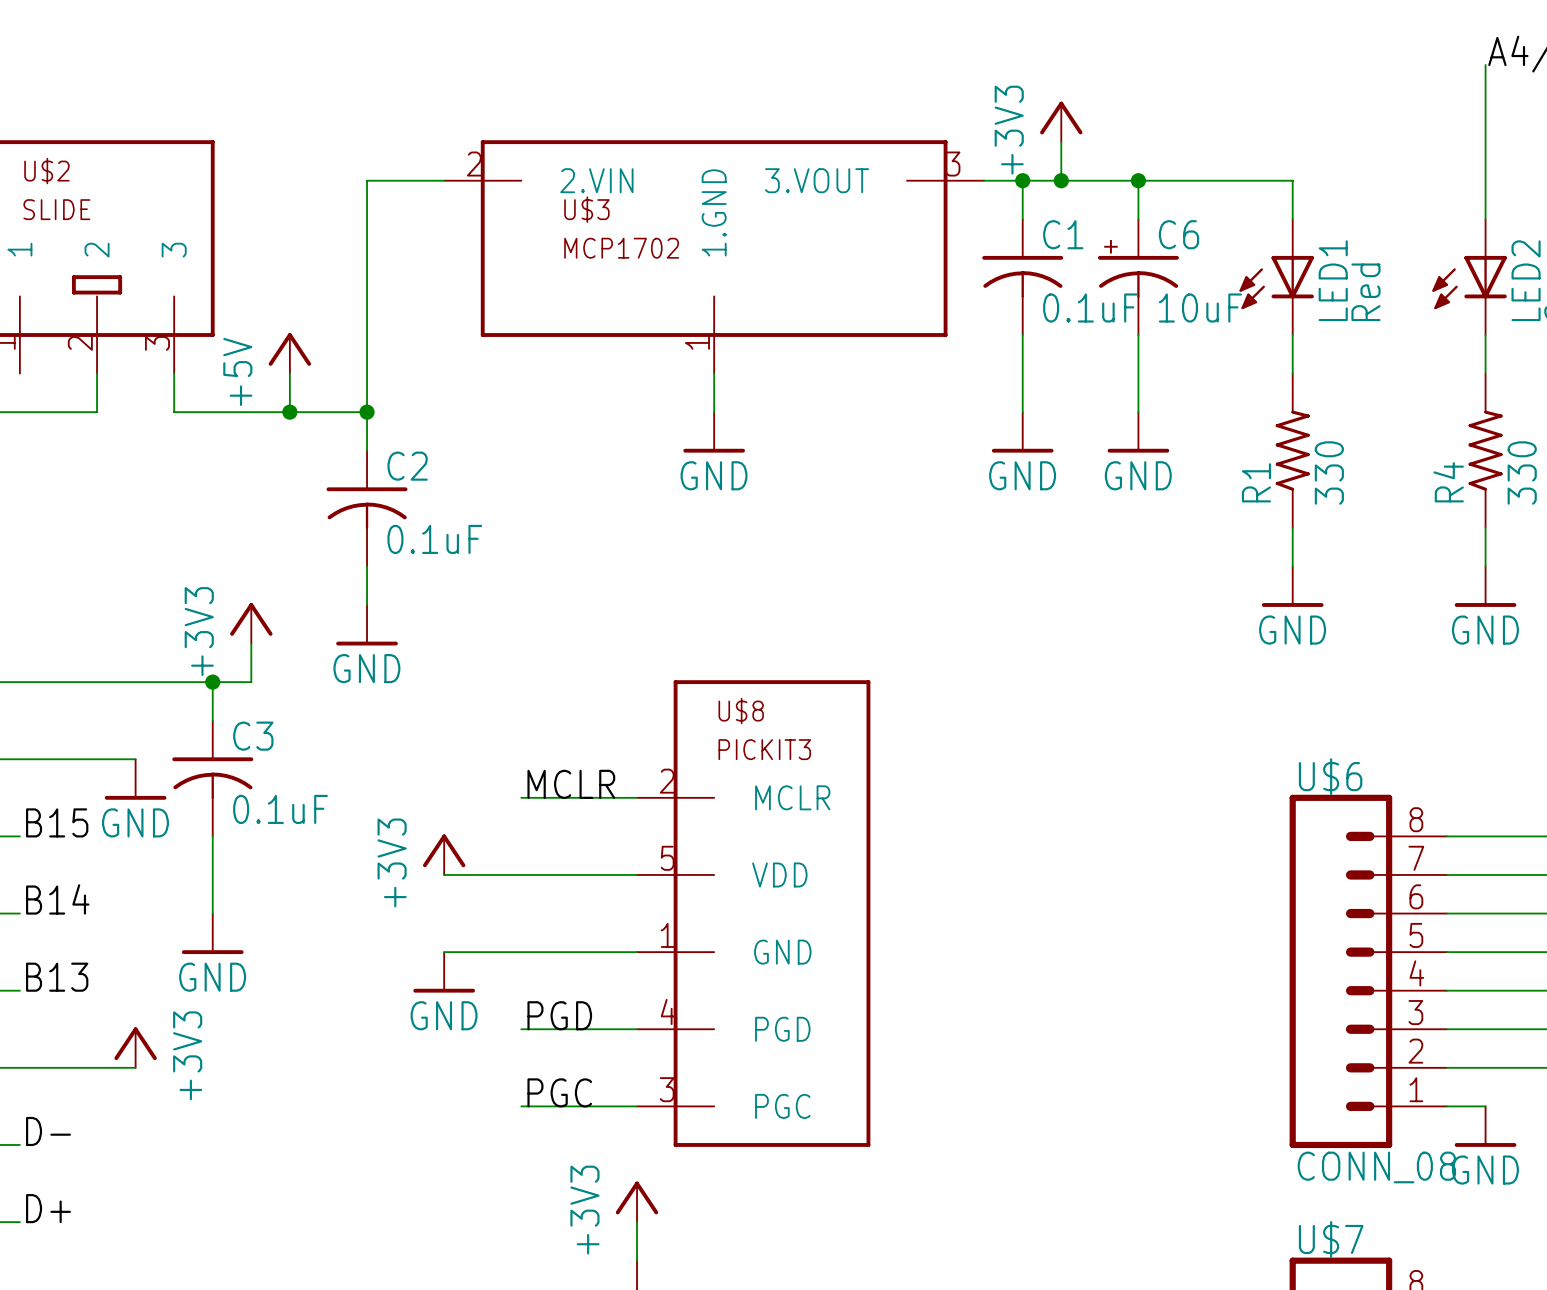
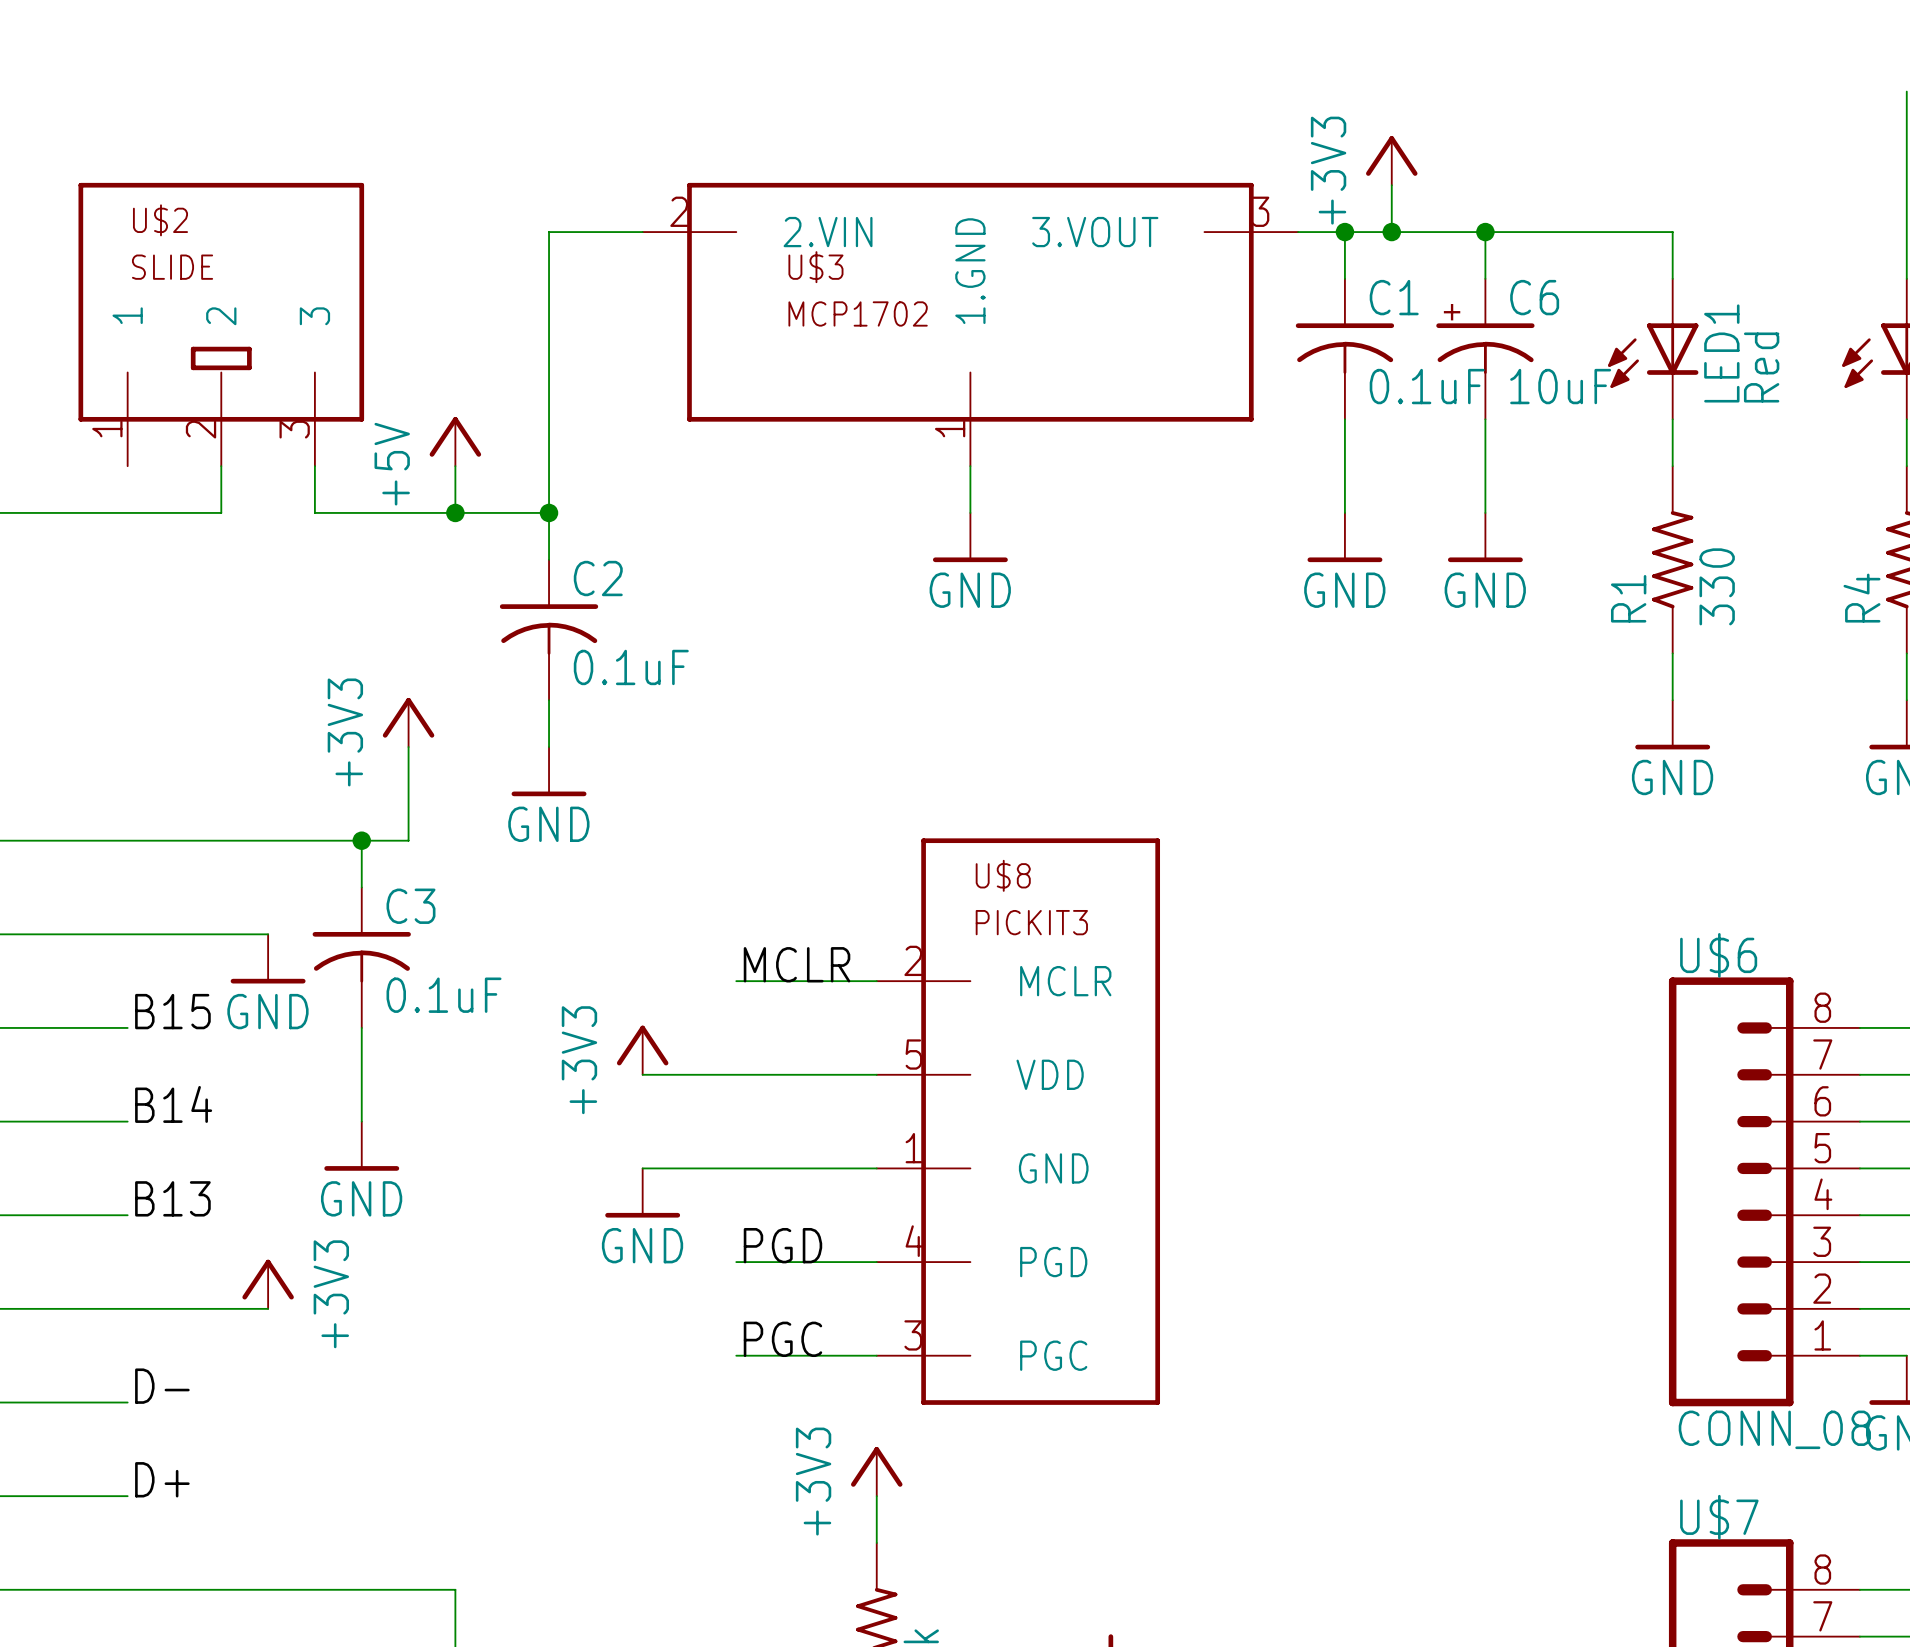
power symbol position: +3V3 (251, 623) -> +3V3 (408, 722)

